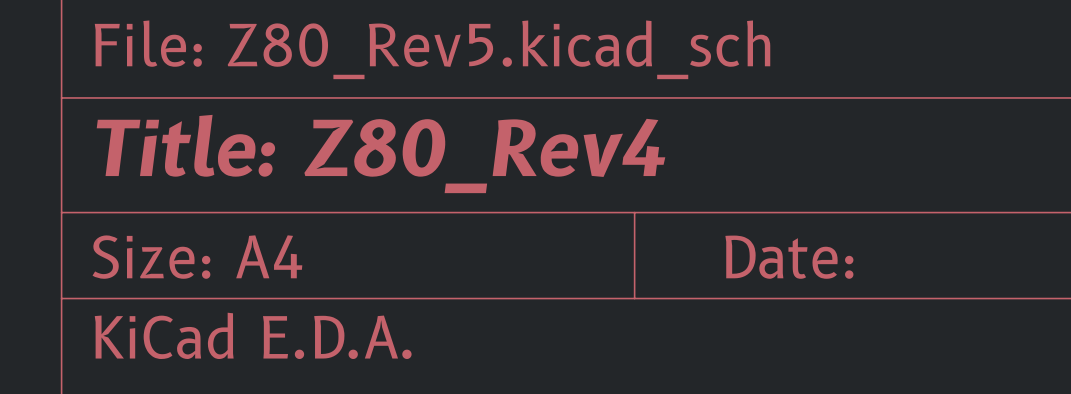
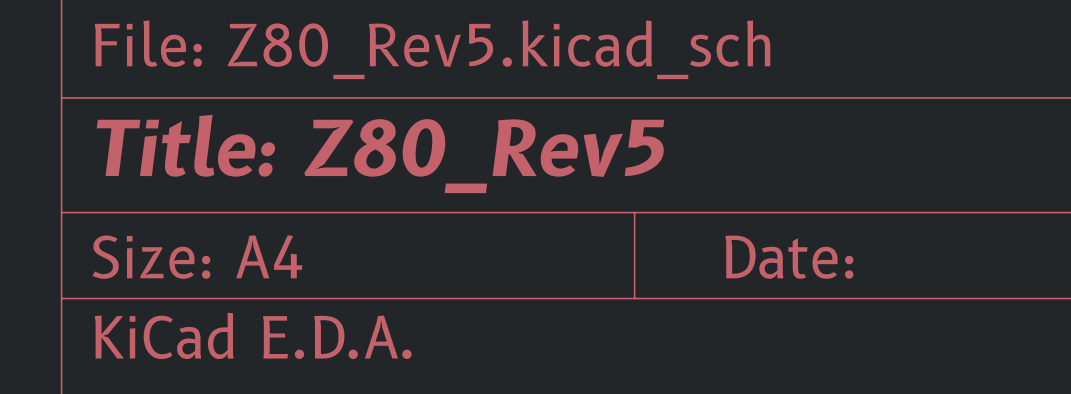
title block: Title: Z80_Rev4 (381, 153) -> Title: Z80_Rev5 (380, 153)

